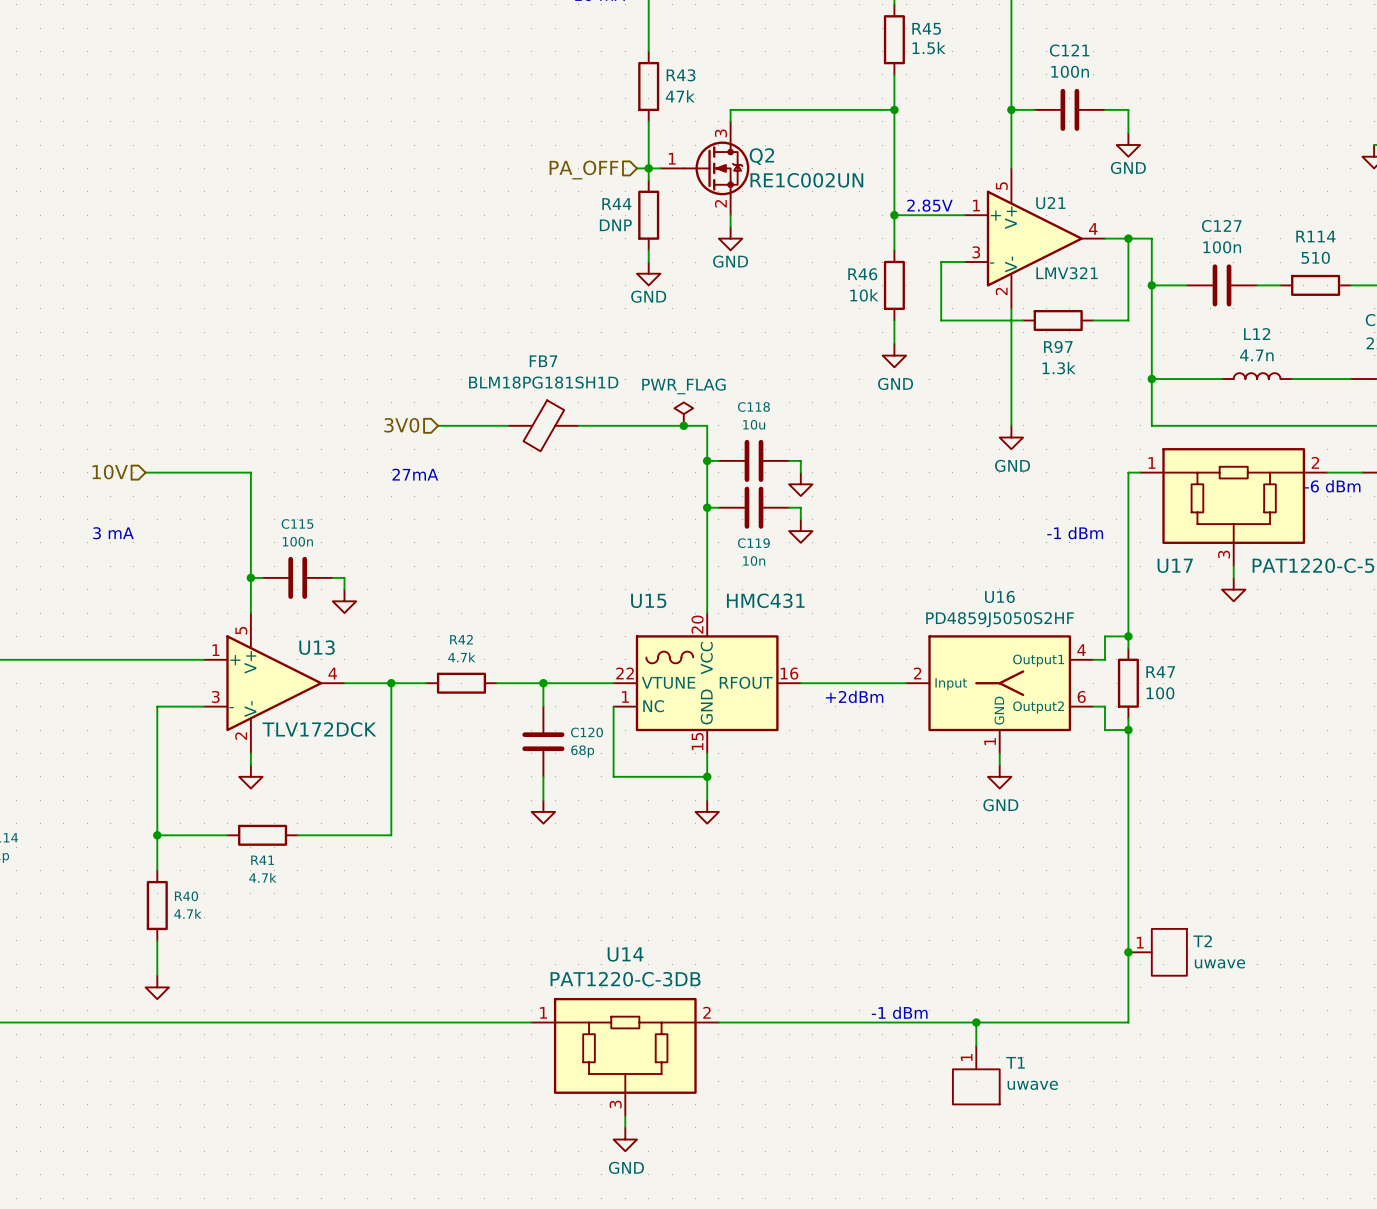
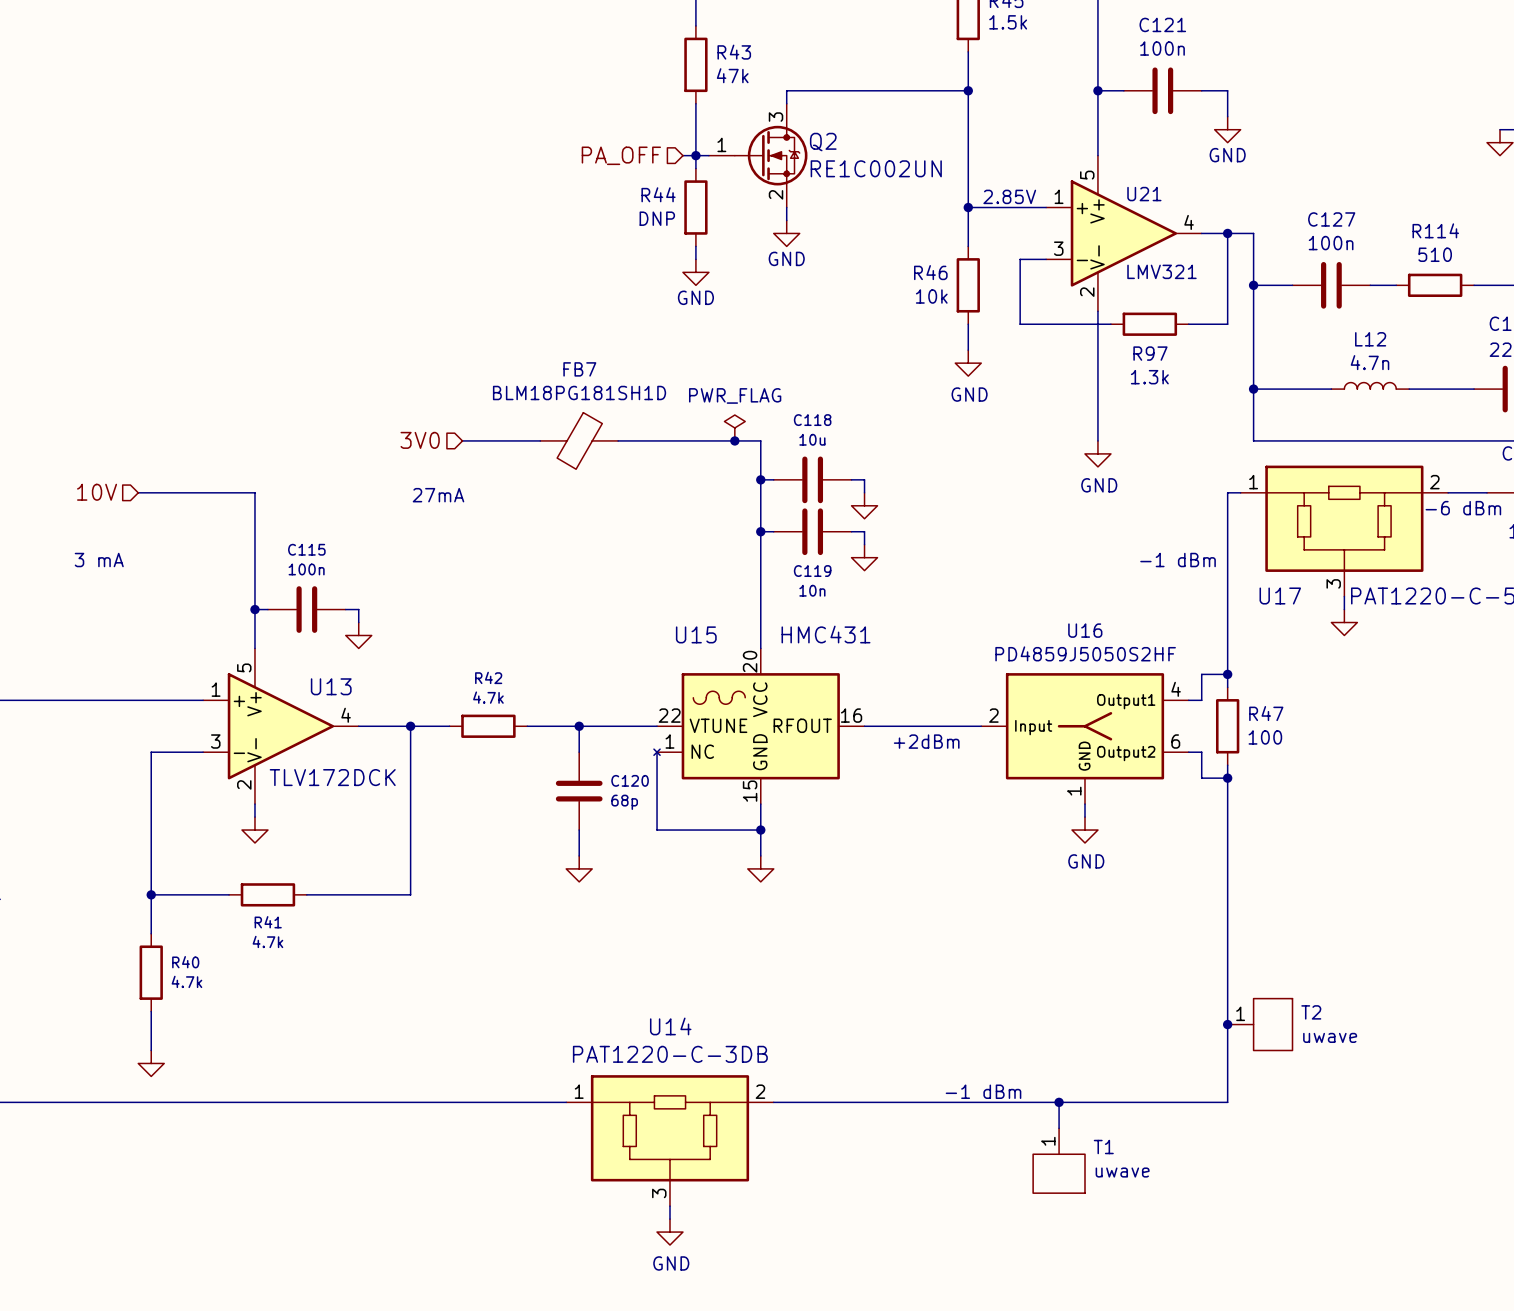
U15 symbol: [613, 613, 801, 754] -> [653, 648, 865, 805]

